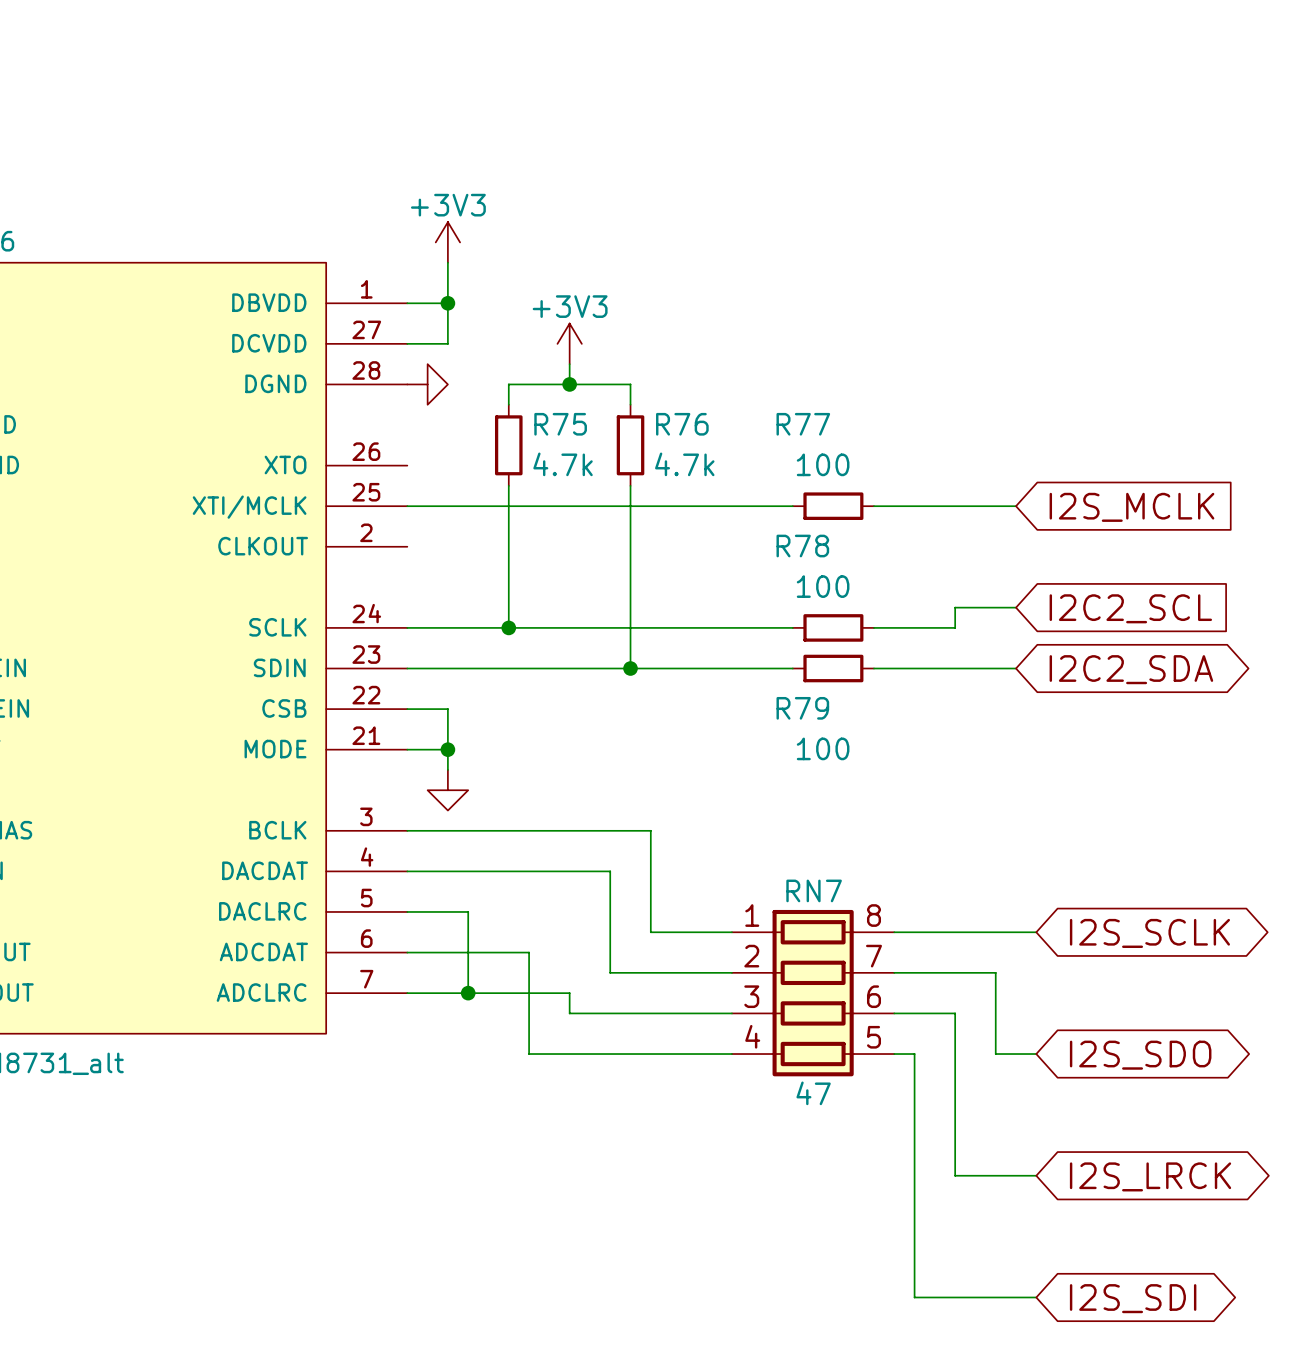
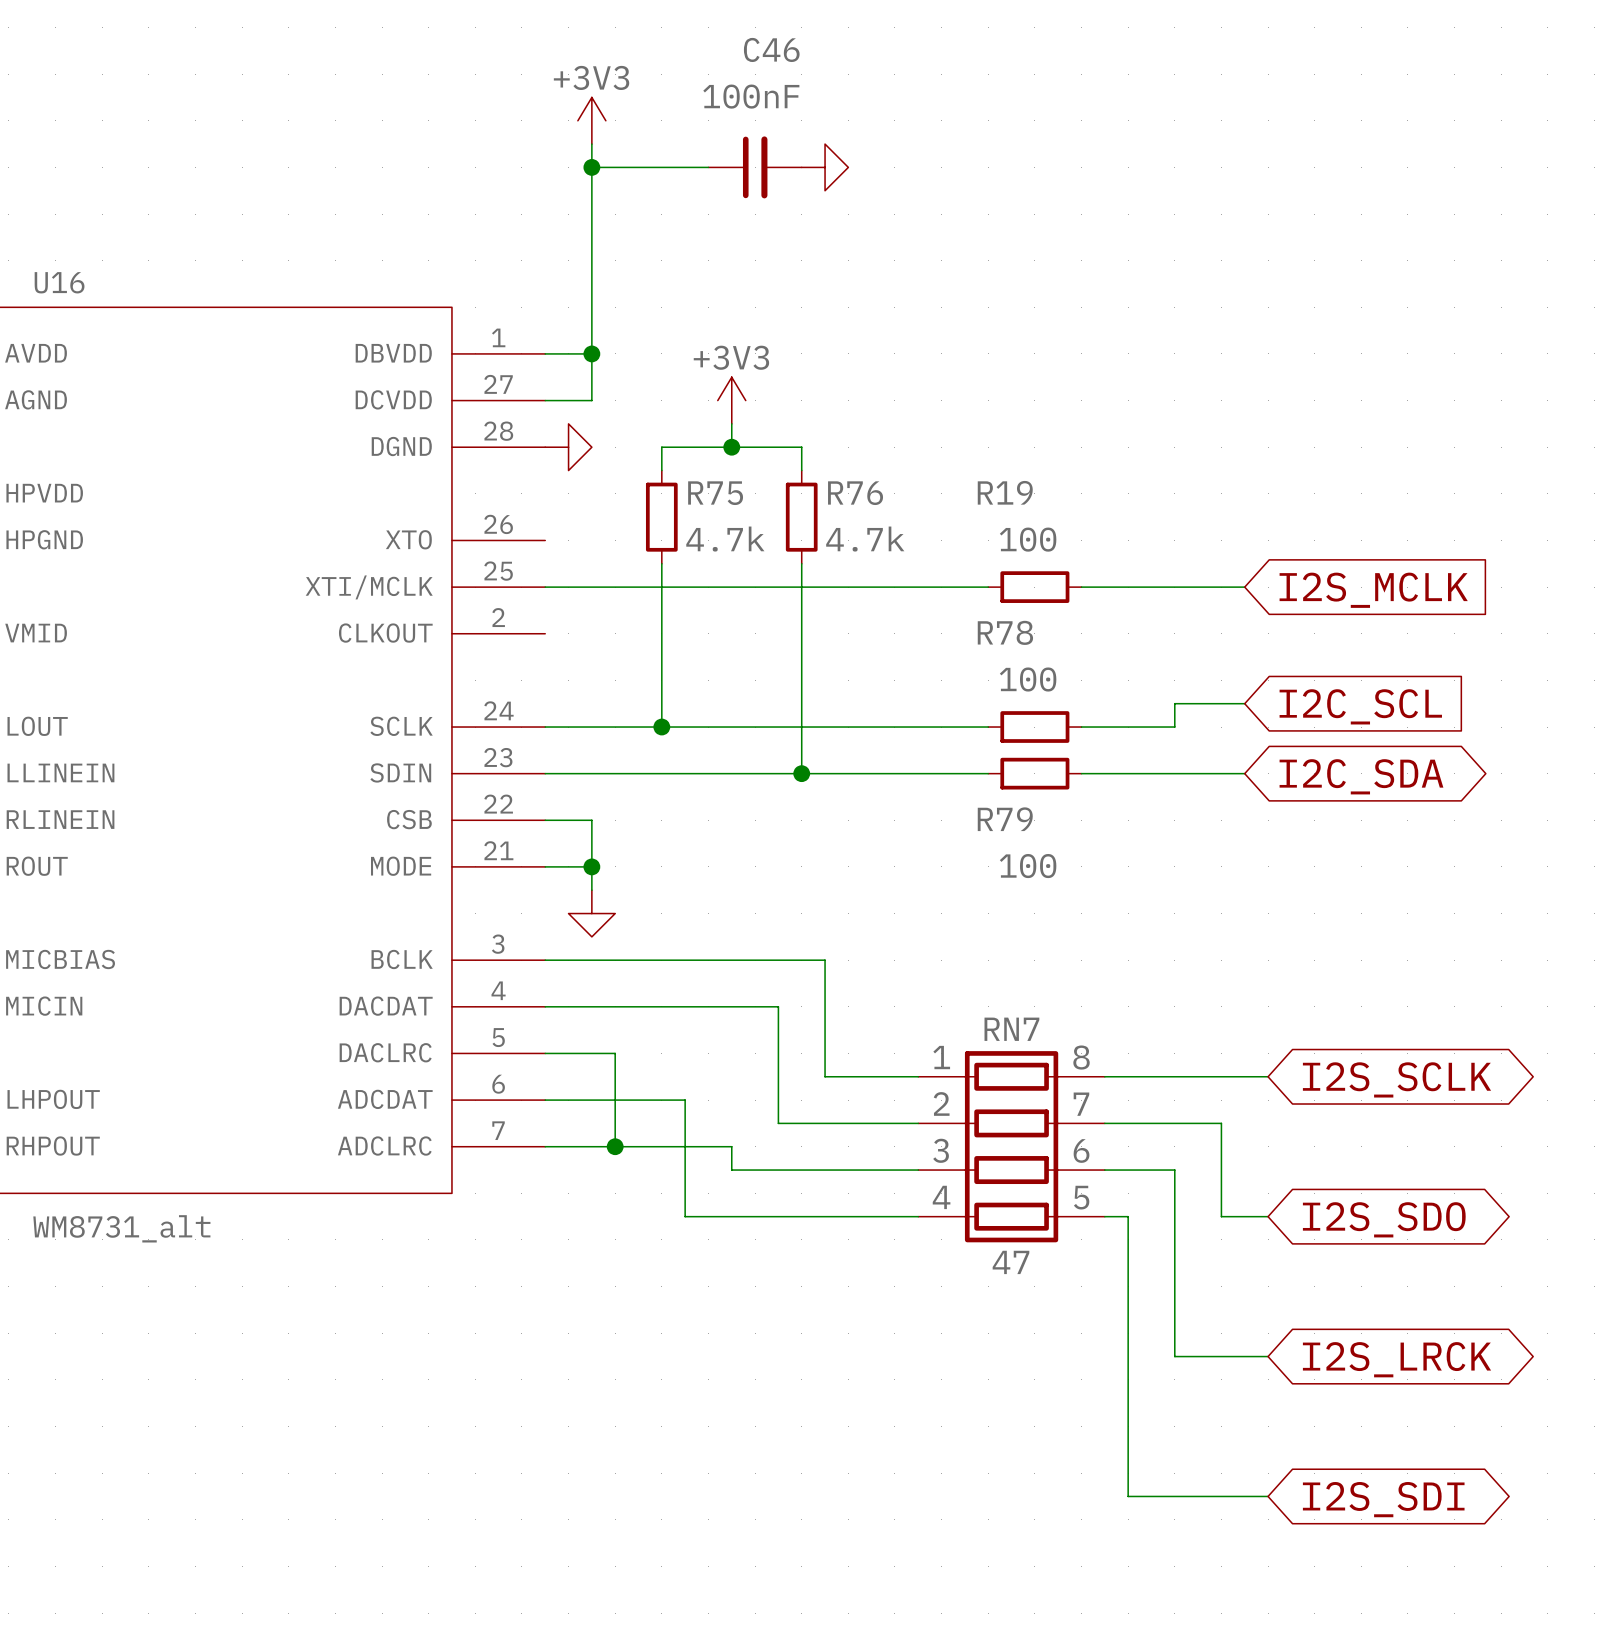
wire: none -> (591, 144) (591, 307)
wire: none -> (591, 167) (708, 167)
junction: none -> (591, 167)
C46: none -> 100nF (755, 167)
power symbol: none -> (825, 167)
power symbol position: +3V3 (447, 242) -> +3V3 (591, 120)
R77 name: R77 (803, 424) -> R19 (1005, 492)
global label: I2C2_SCL (1130, 608) -> I2C_SCL (1360, 706)
global label: I2C2_SDA (1131, 669) -> I2C_SDA (1361, 776)

